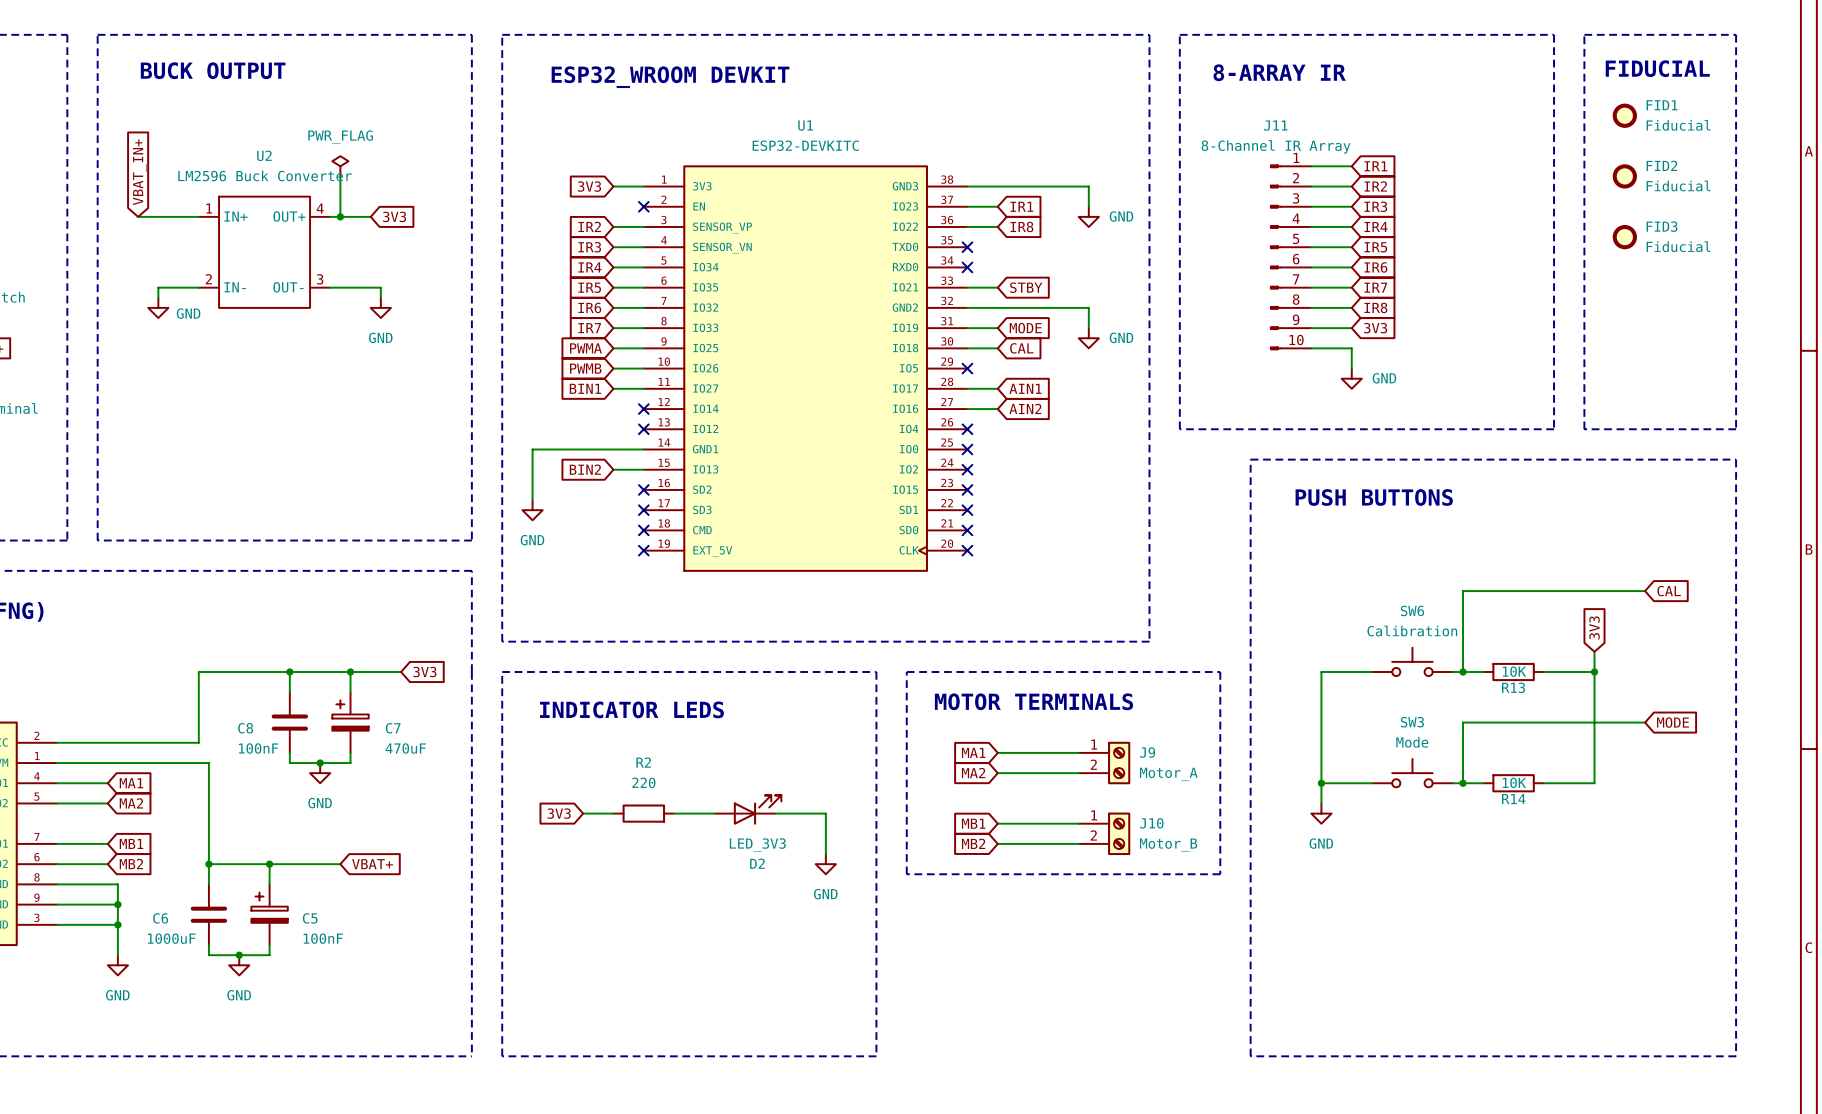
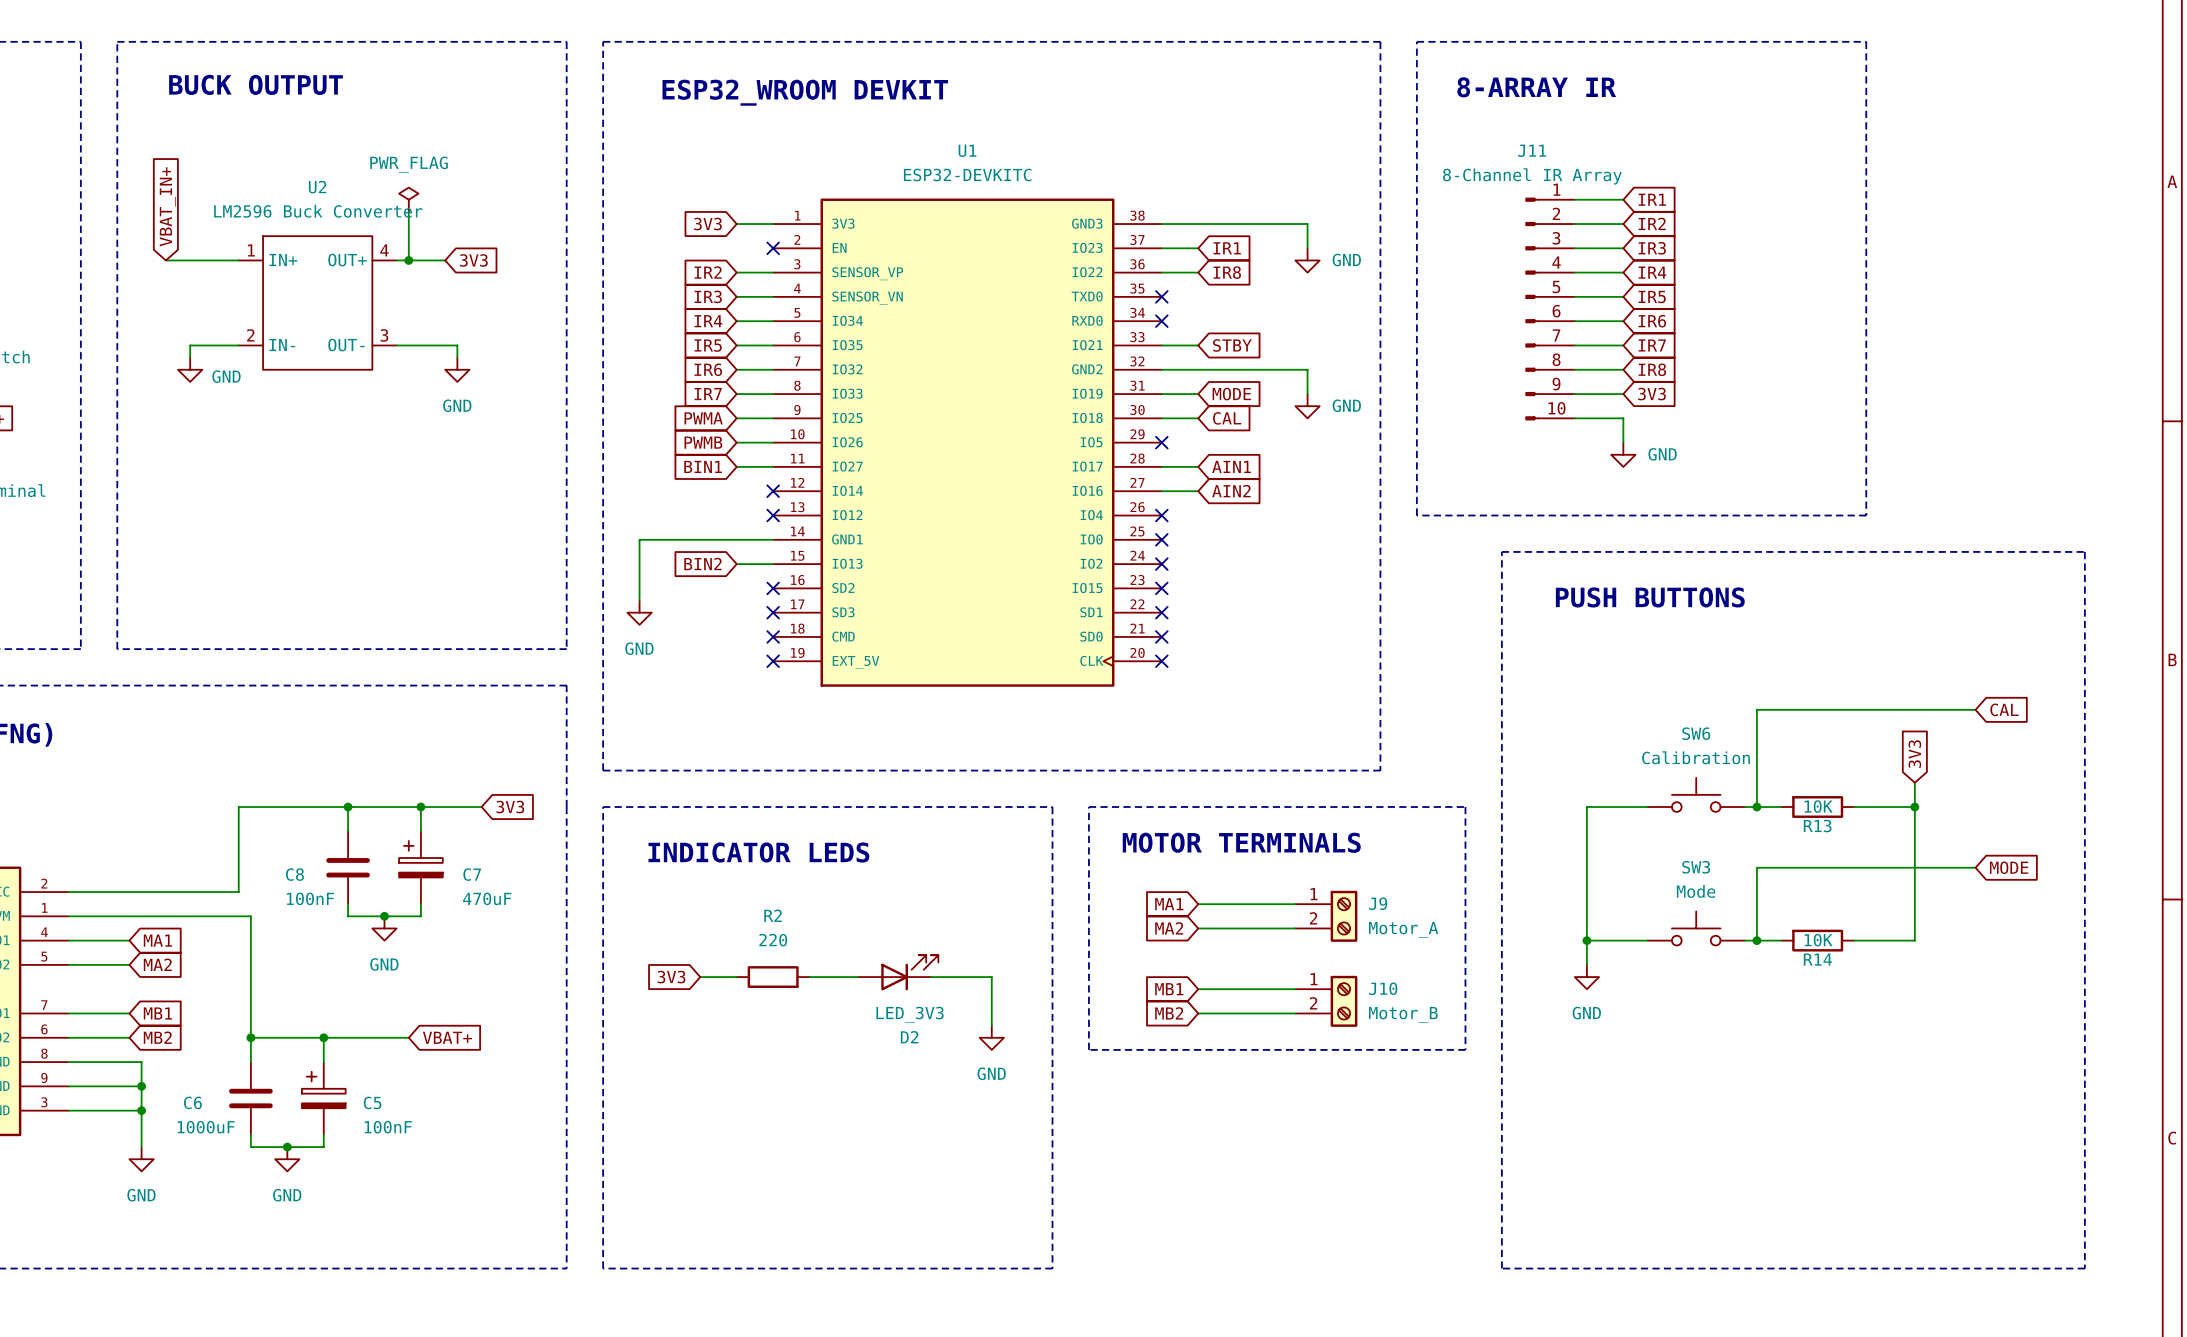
line: (1584, 34) (1736, 34) (1736, 429) (1584, 429) (1584, 34) -> none
text: FIDUCIAL (1657, 68) -> none
FID1: Fiducial (1624, 115) -> none
FID2: Fiducial (1624, 176) -> none
FID3: Fiducial (1624, 237) -> none

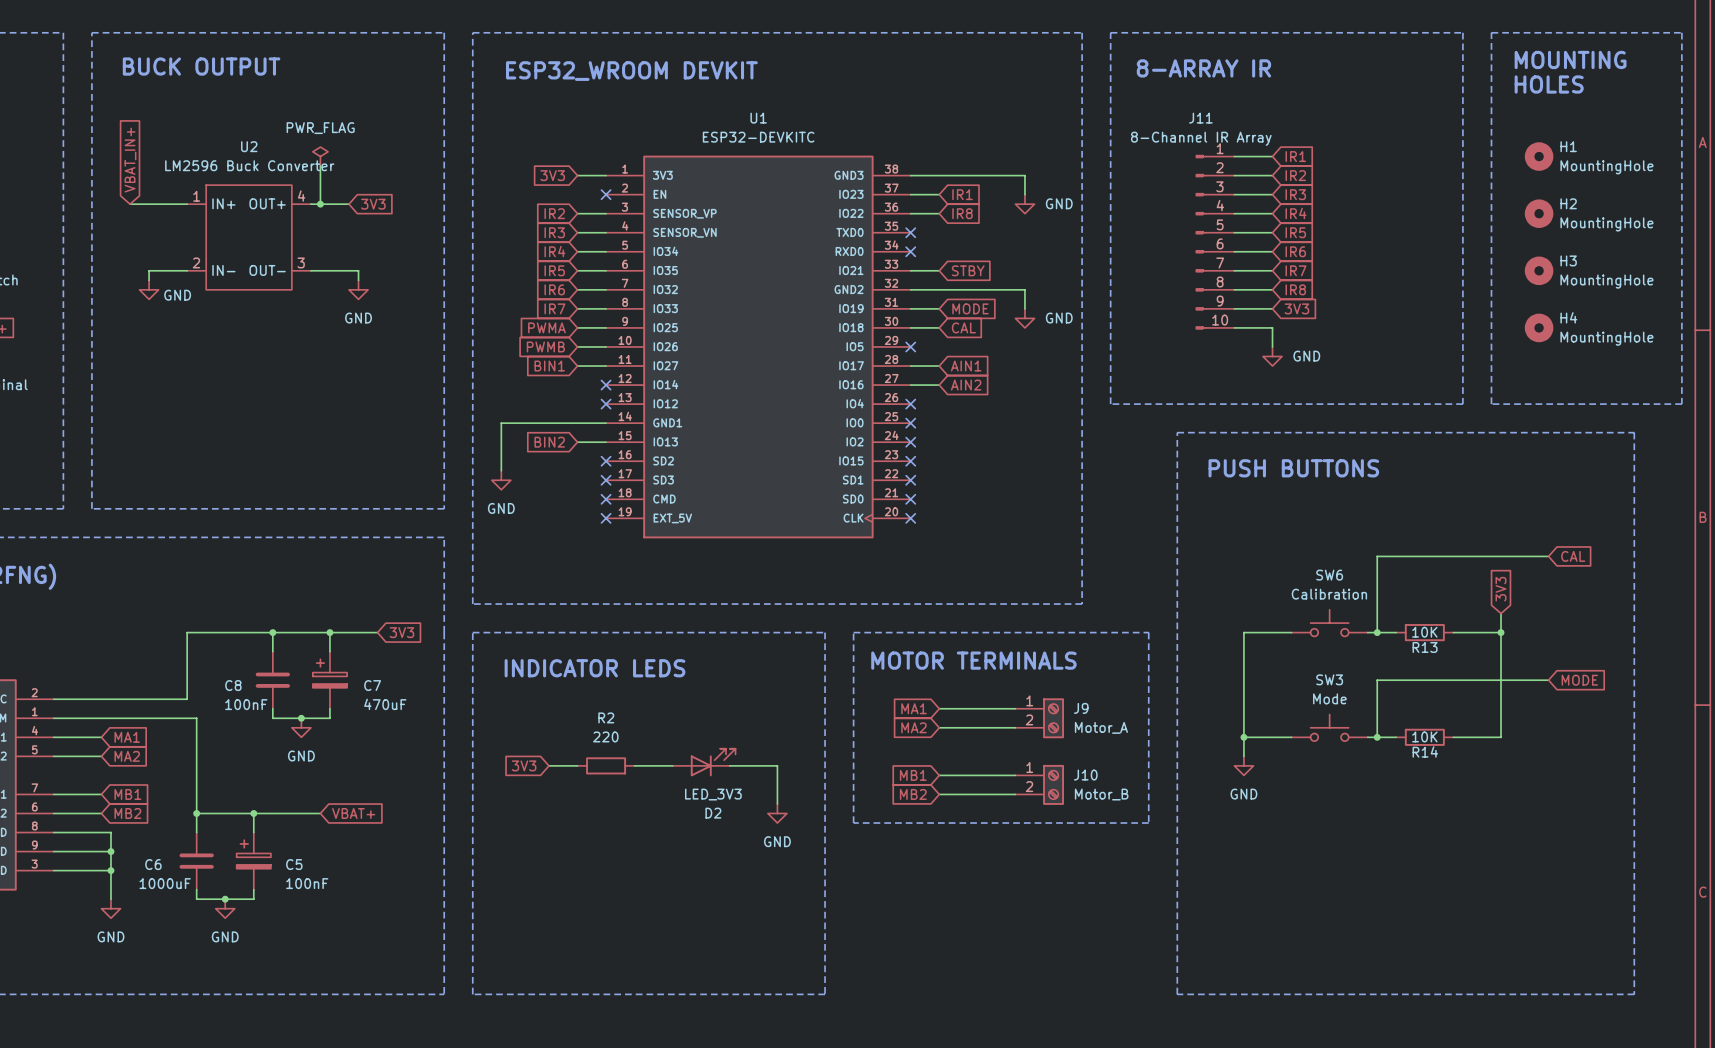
line: none -> (1491, 32) (1681, 32) (1681, 404) (1491, 404) (1491, 32)
text: none -> MOUNTING (1570, 59)
text: none -> HOLES (1549, 84)
H1: none -> MountingHole (1539, 156)
H2: none -> MountingHole (1539, 213)
H3: none -> MountingHole (1539, 270)
H4: none -> MountingHole (1539, 327)

